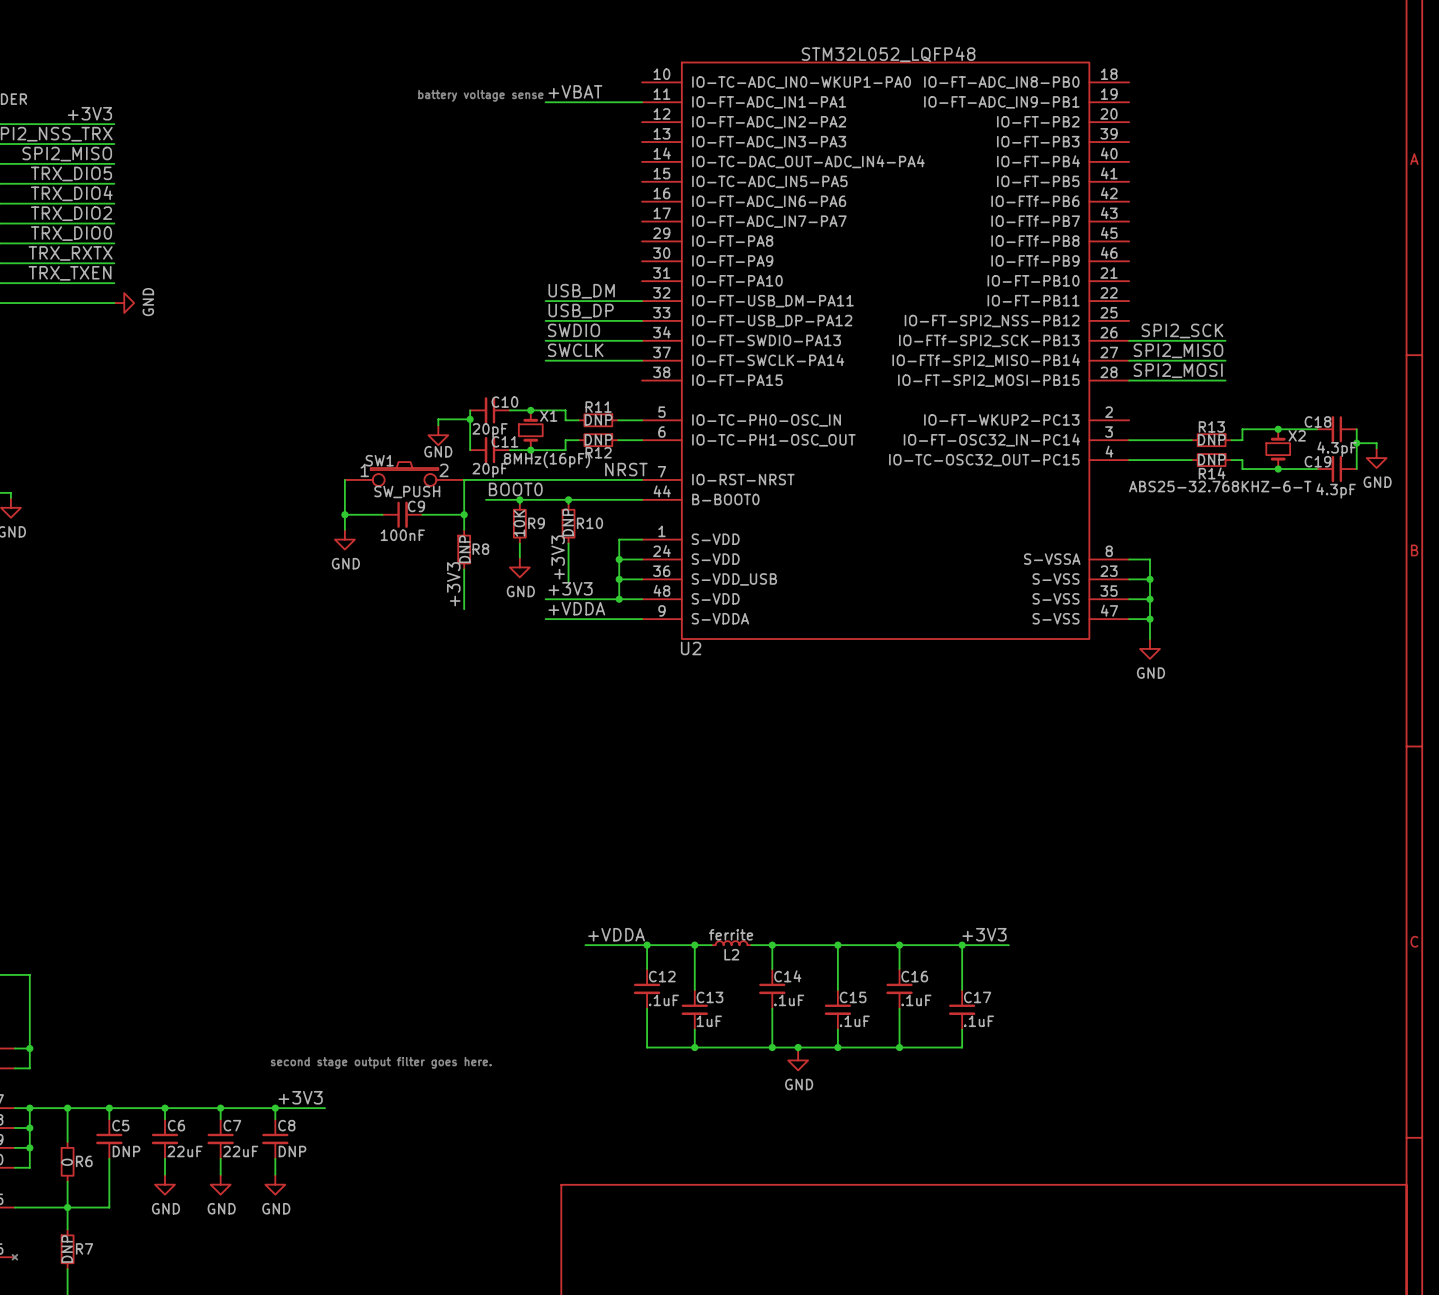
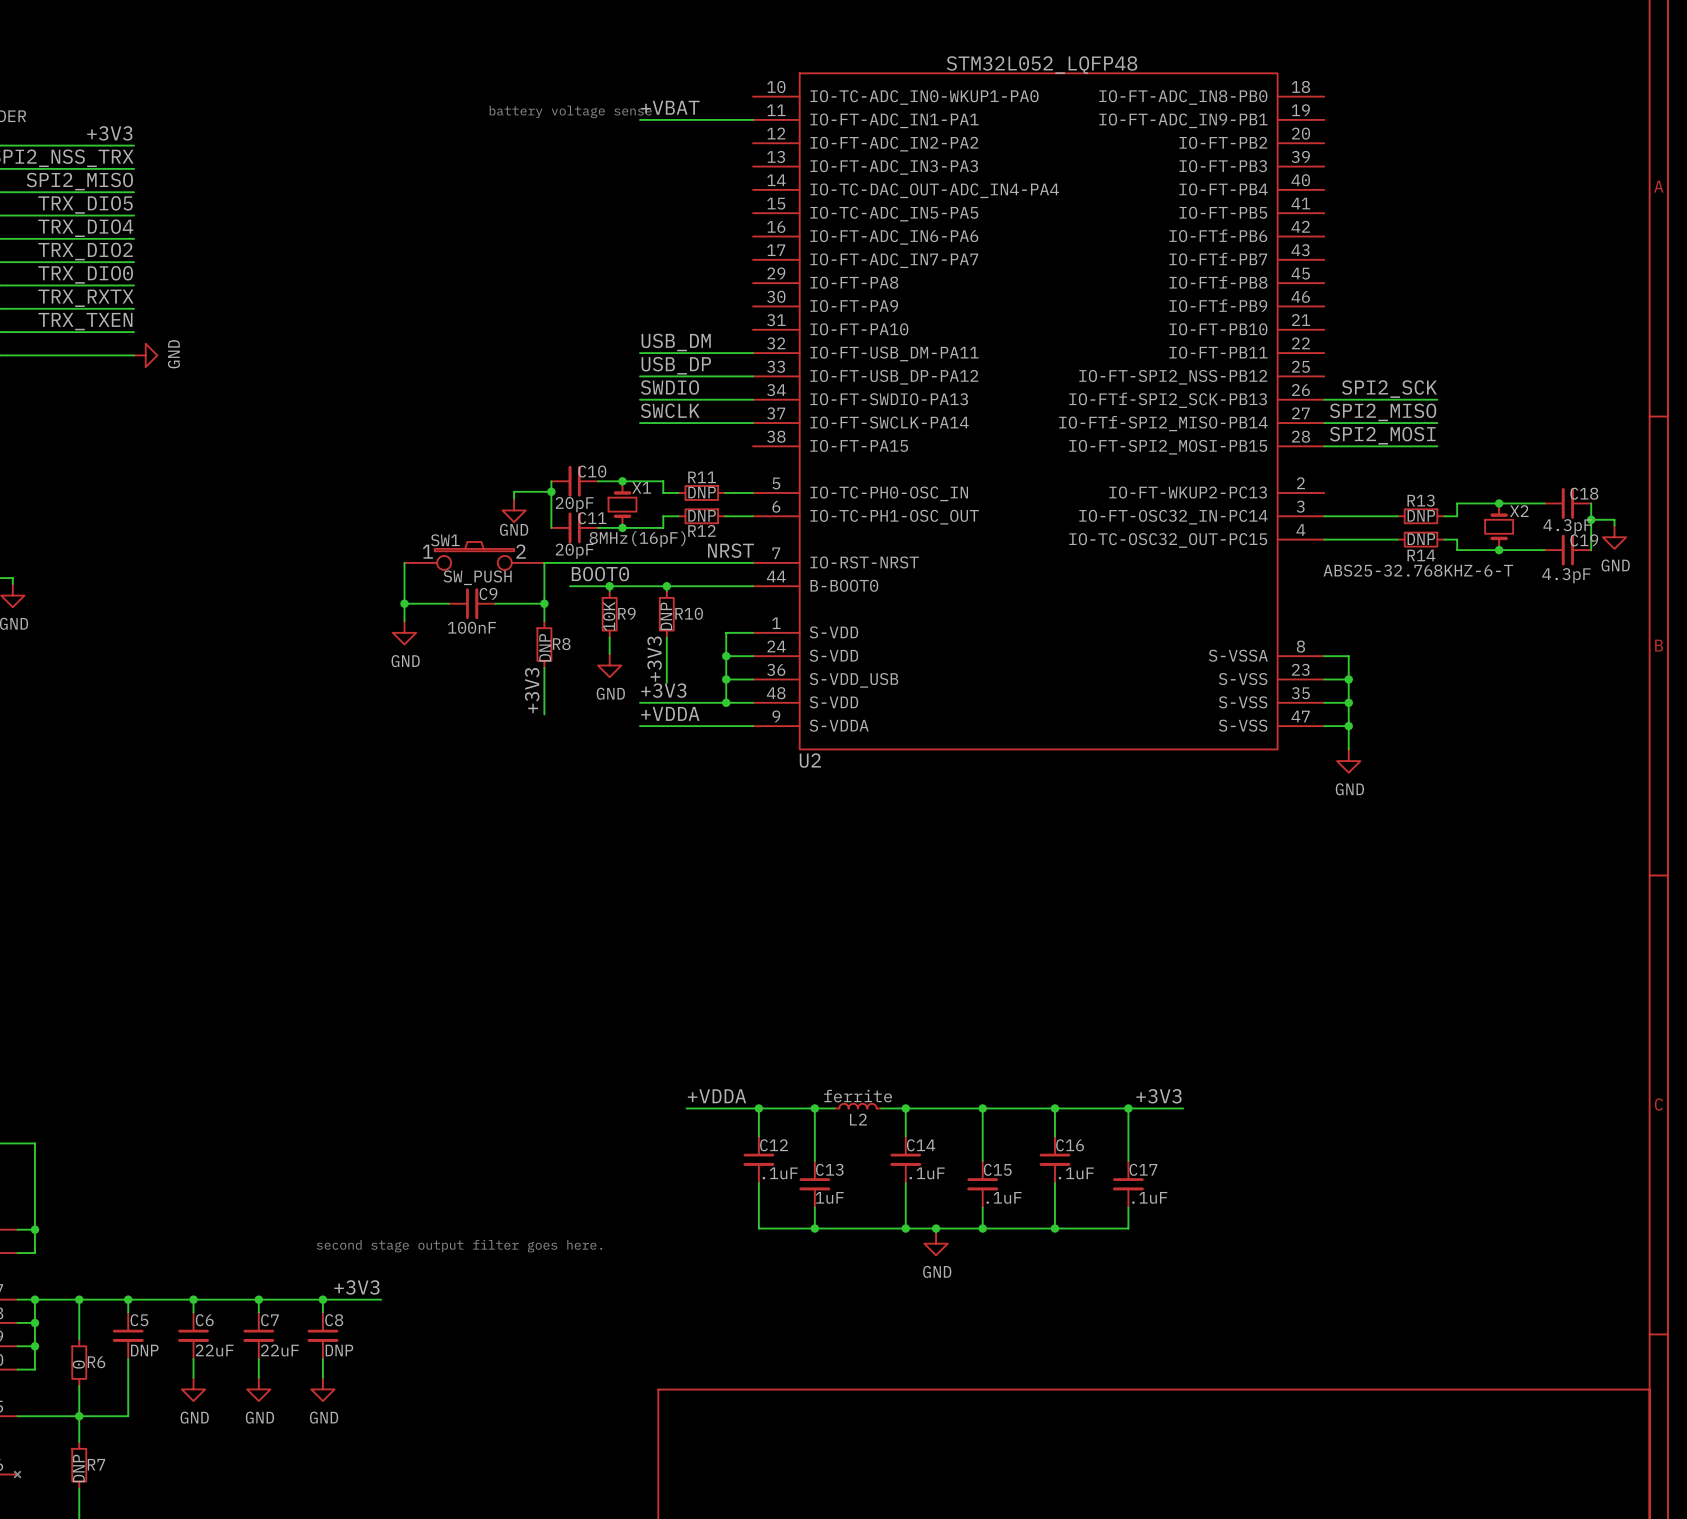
C18 name position: C18 (1317, 421) -> C18 (1584, 493)
C19 name position: C19 (1317, 461) -> C19 (1584, 540)

